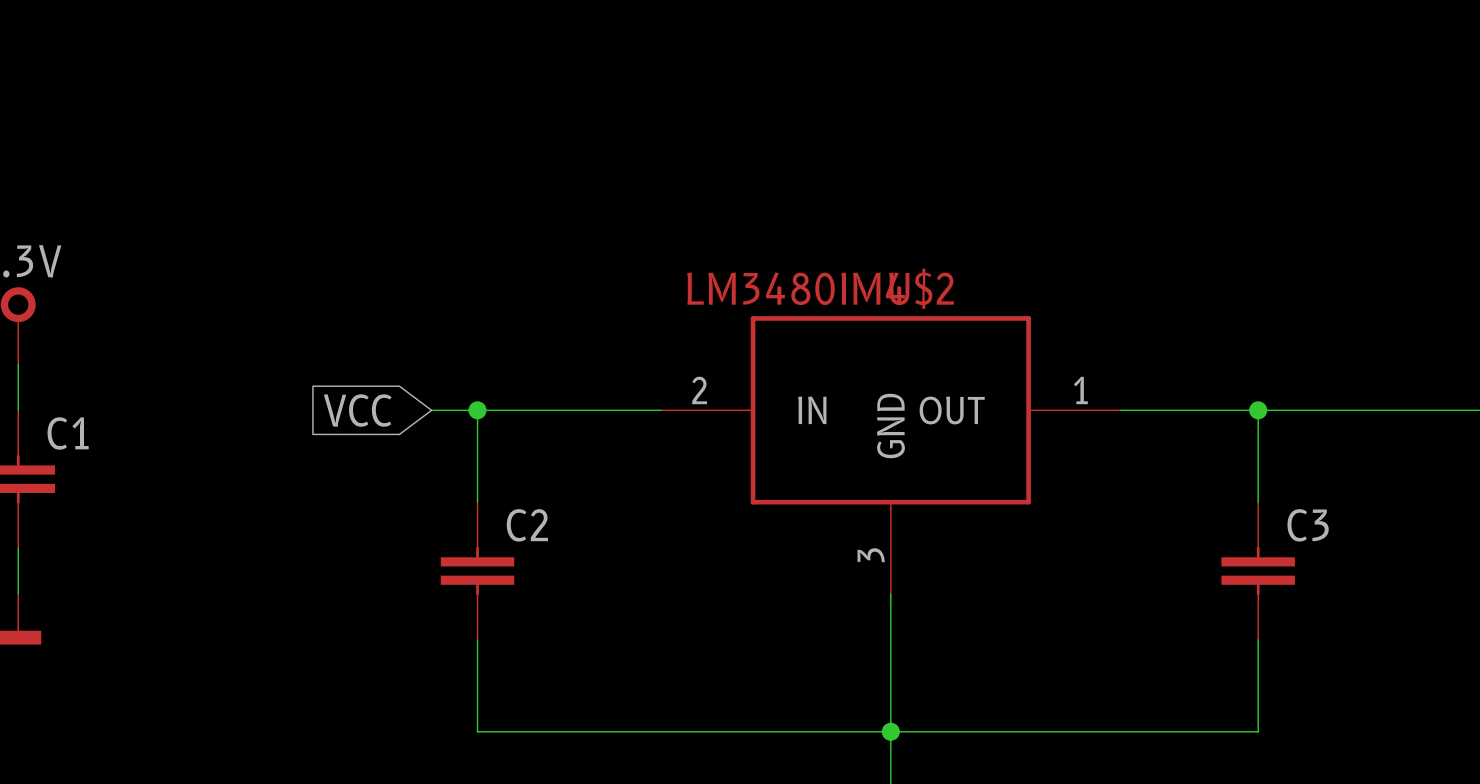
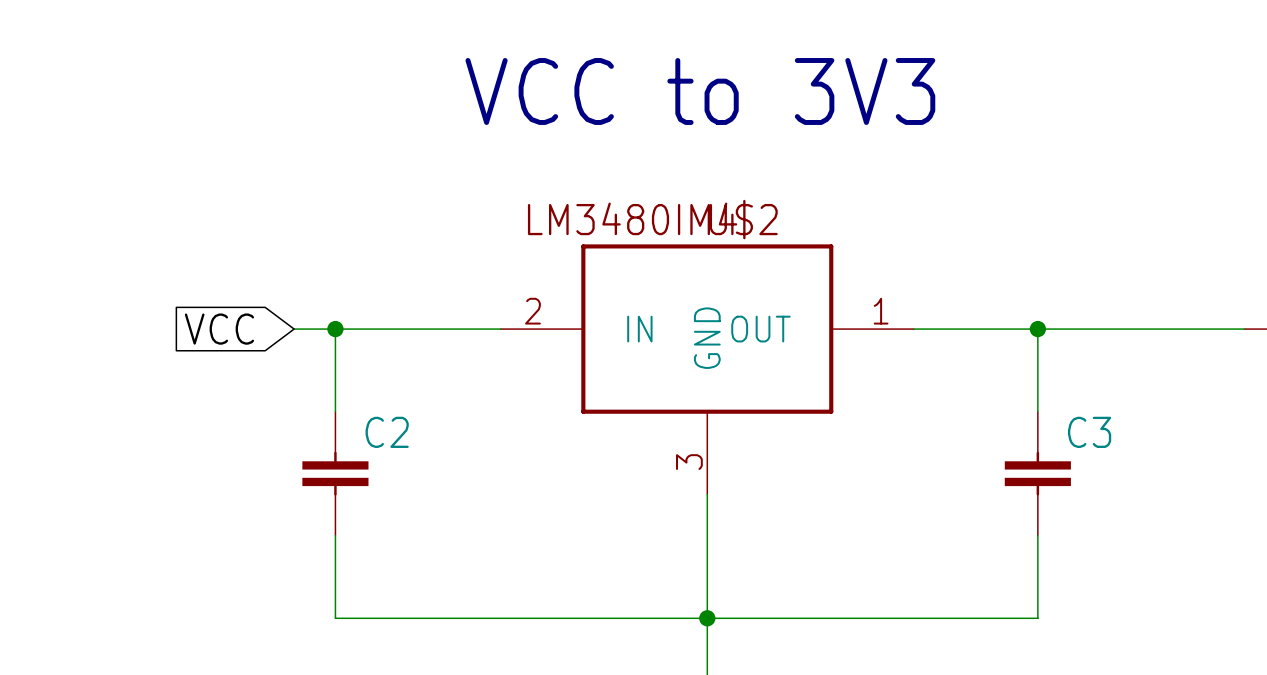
text: none -> VCC to 3V3 (700, 91)

